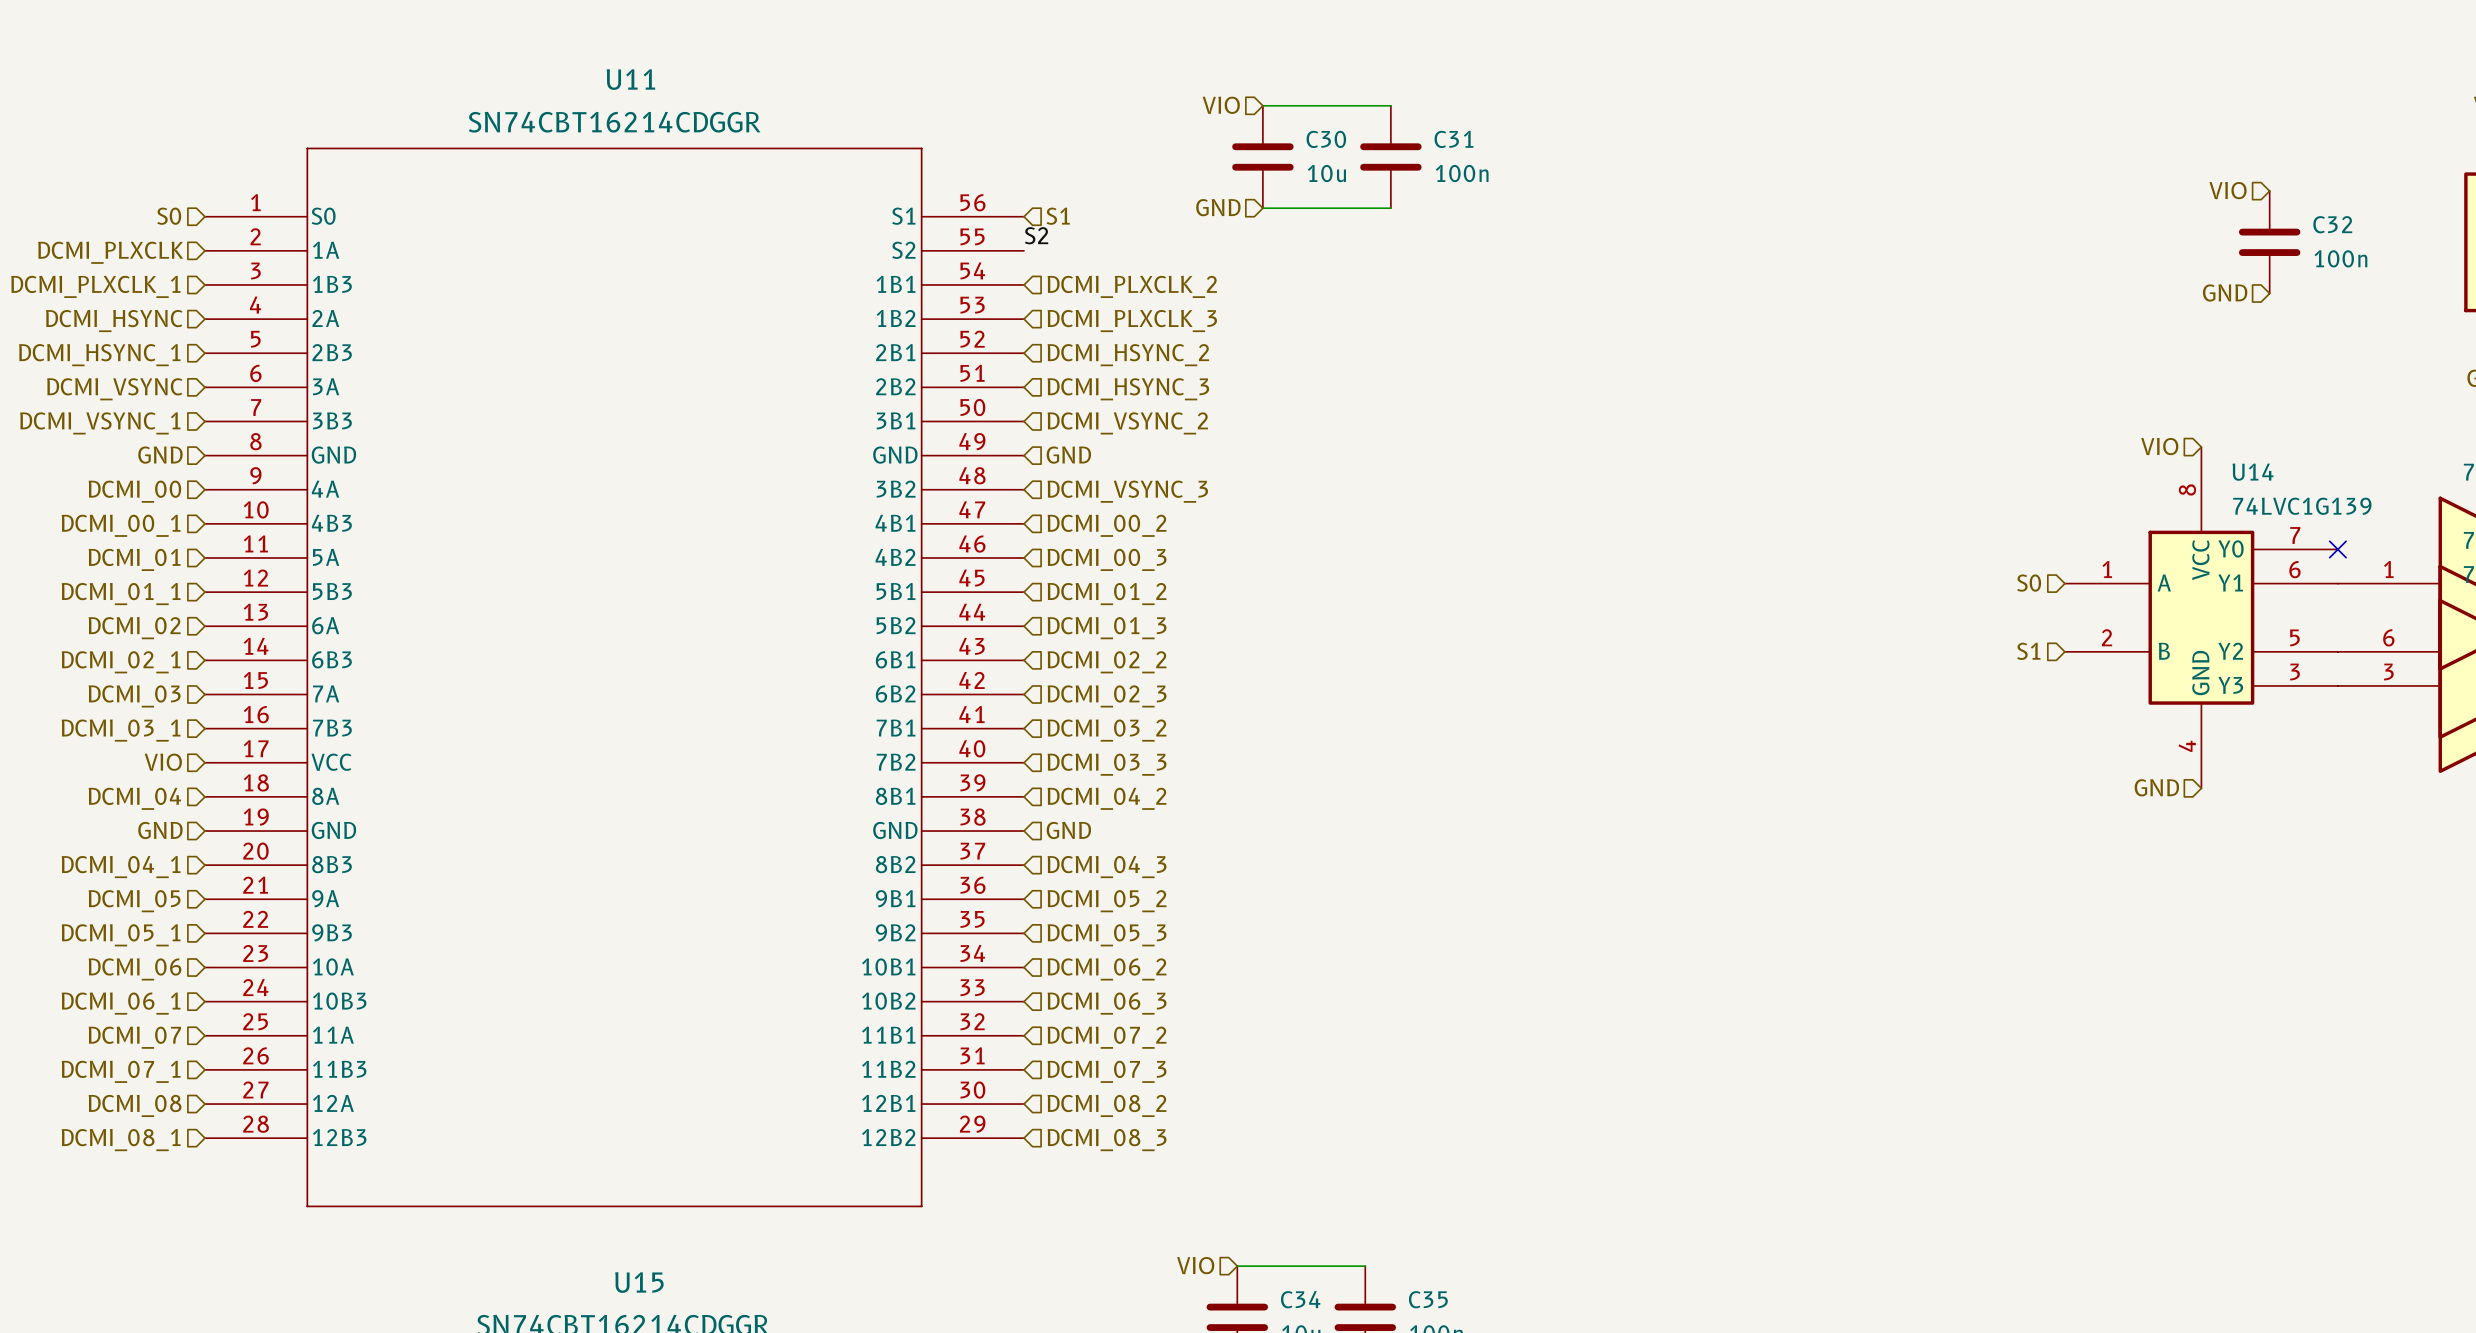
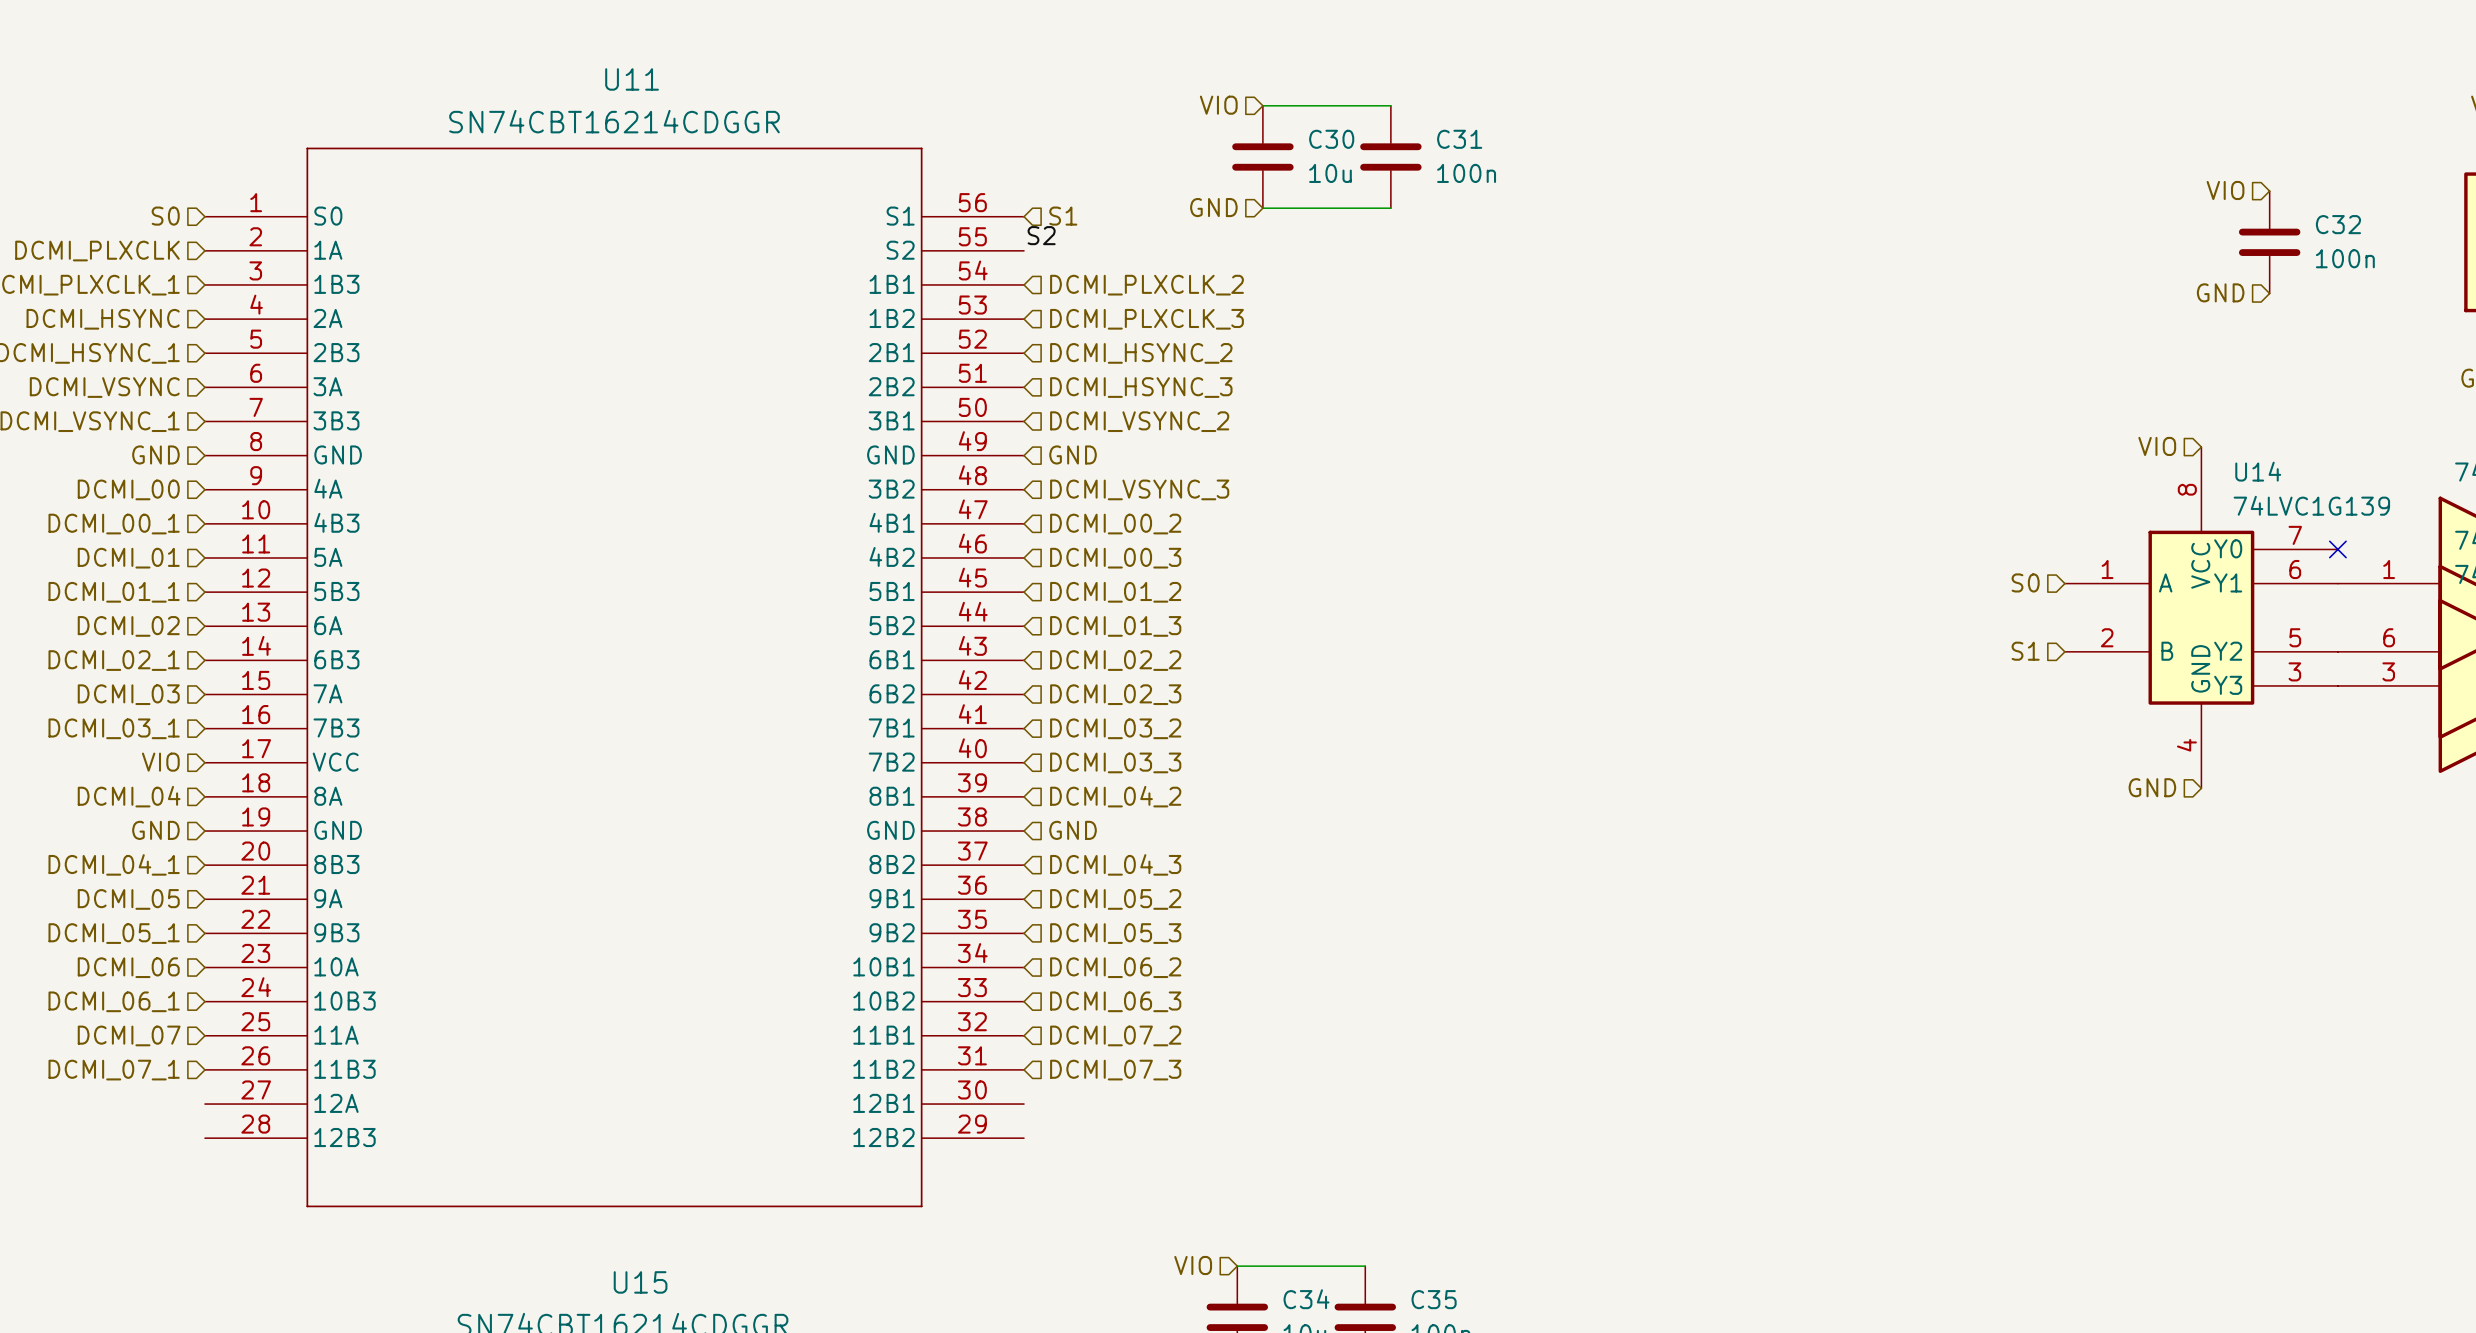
hierarchical label: DCMI_08 (135, 1105) -> none
hierarchical label: DCMI_08_2 (1107, 1105) -> none
hierarchical label: DCMI_08_1 (121, 1140) -> none
hierarchical label: DCMI_08_3 (1107, 1140) -> none

